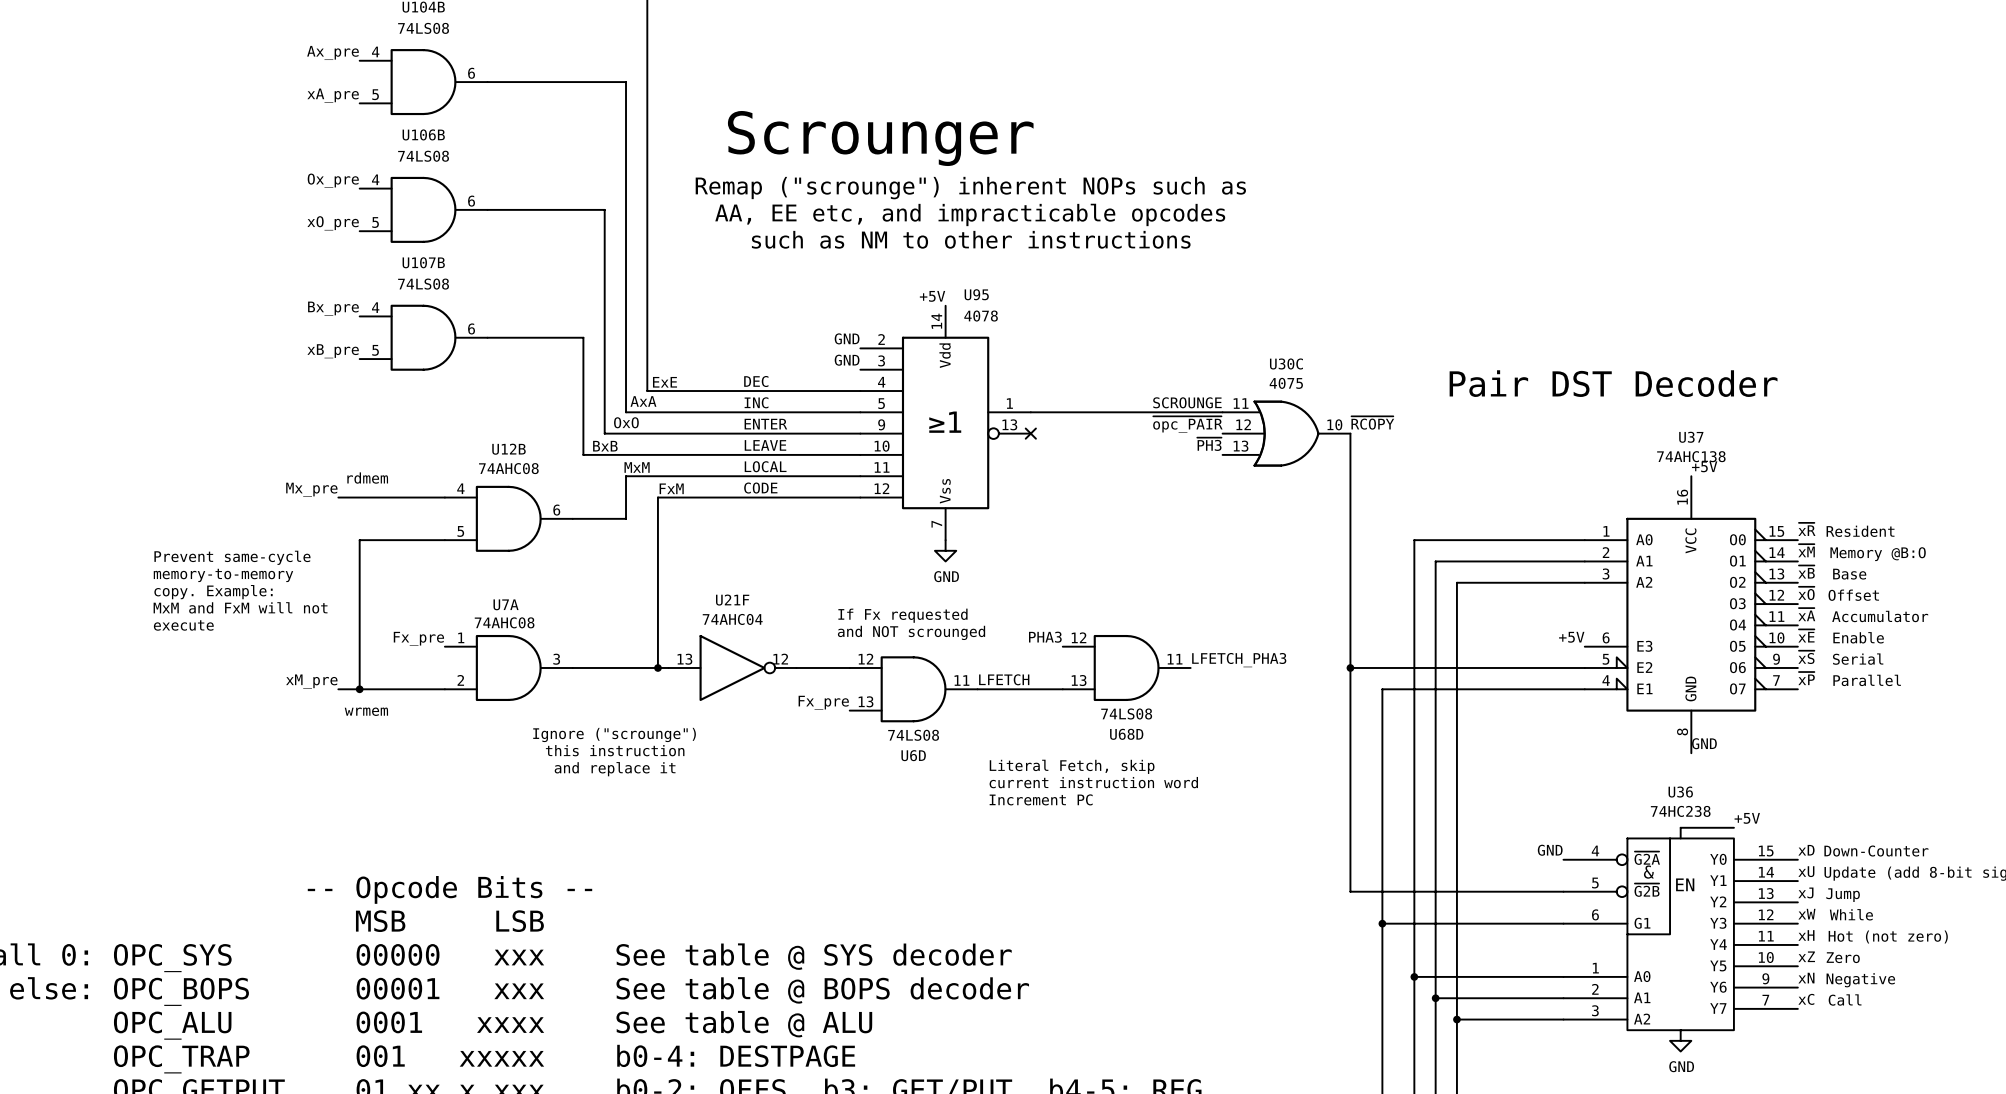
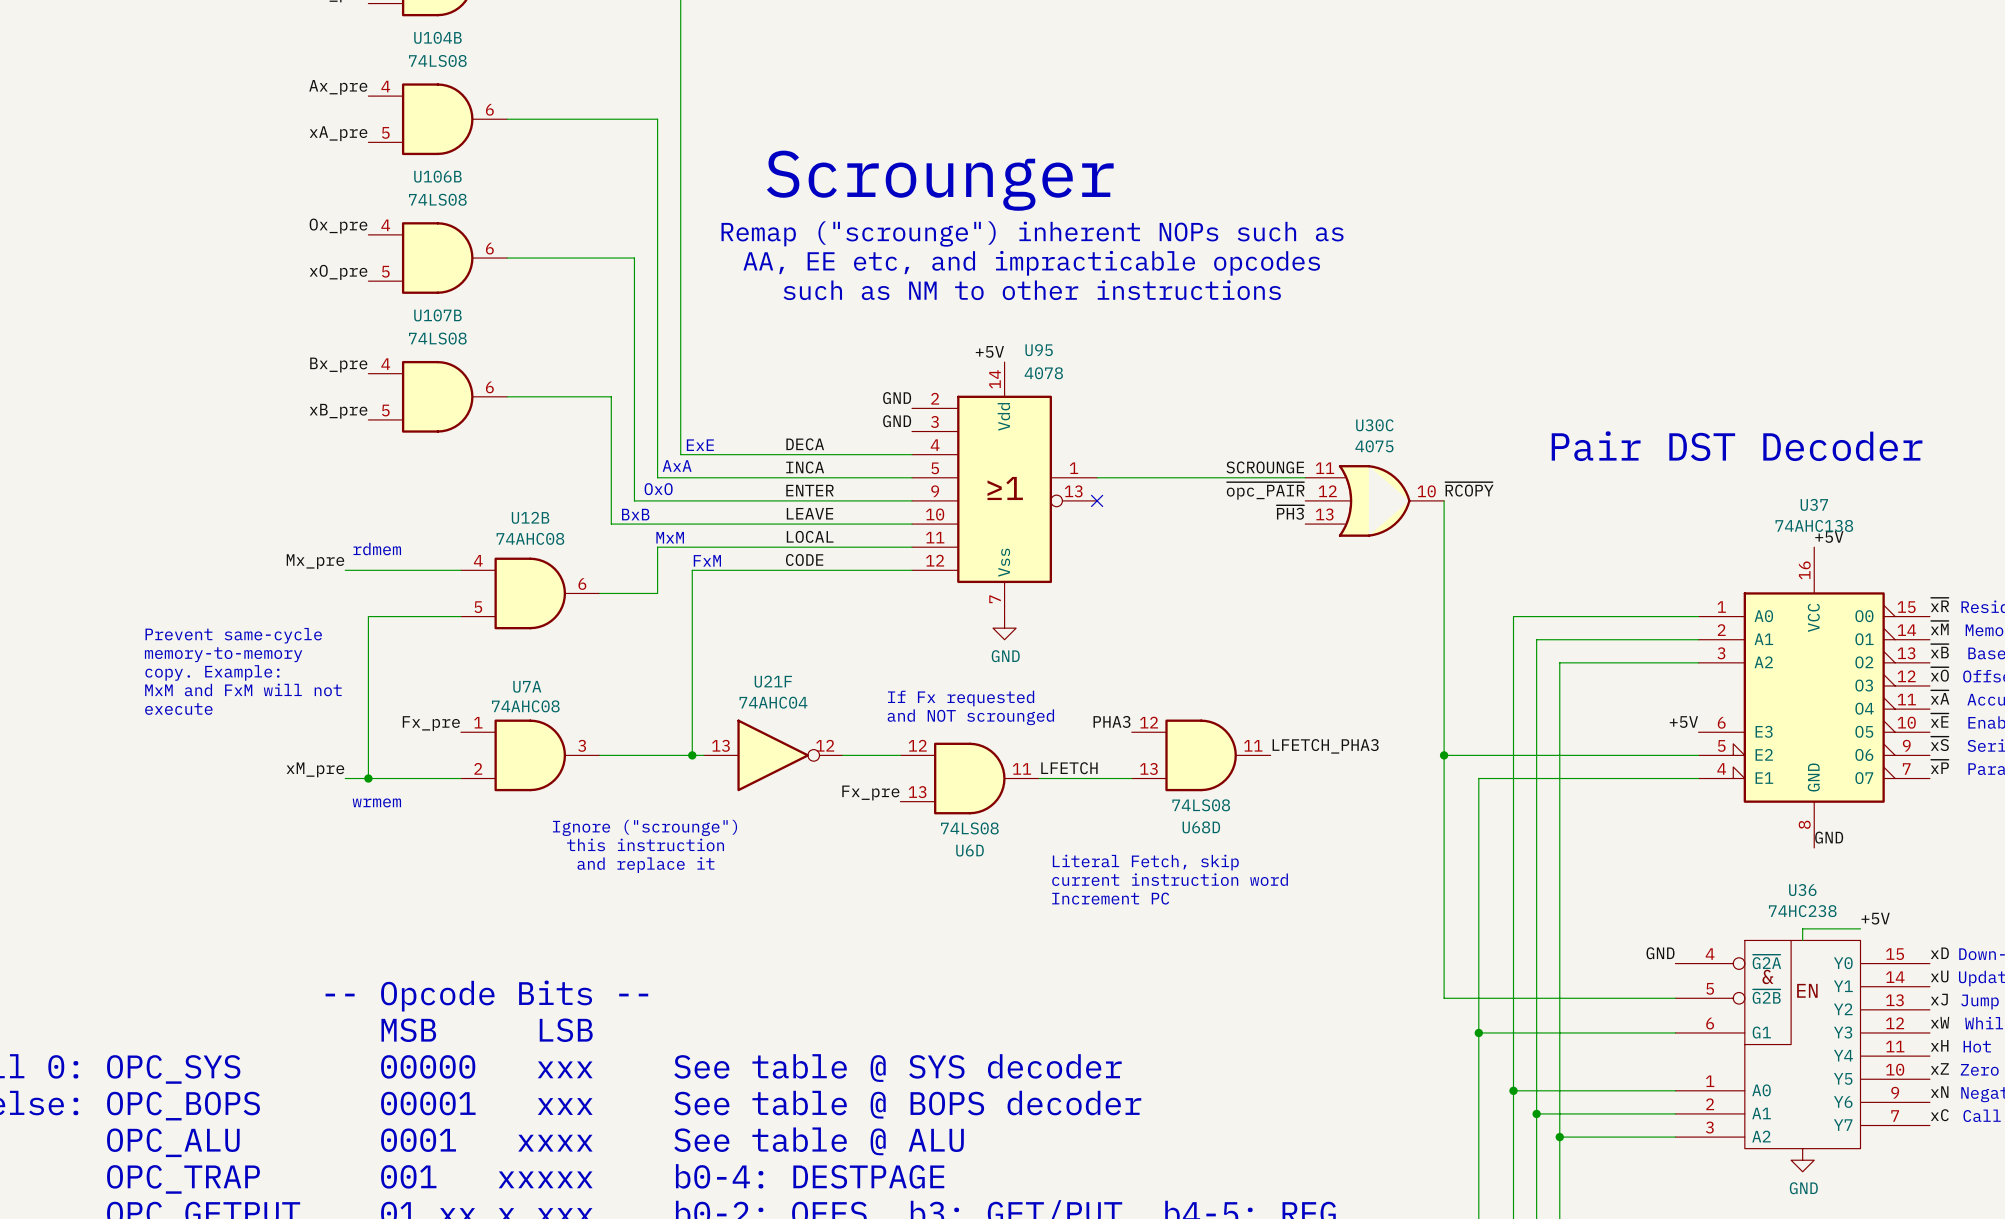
label: DEC (756, 381) -> DECA (805, 444)
label: INC (756, 402) -> INCA (805, 467)

